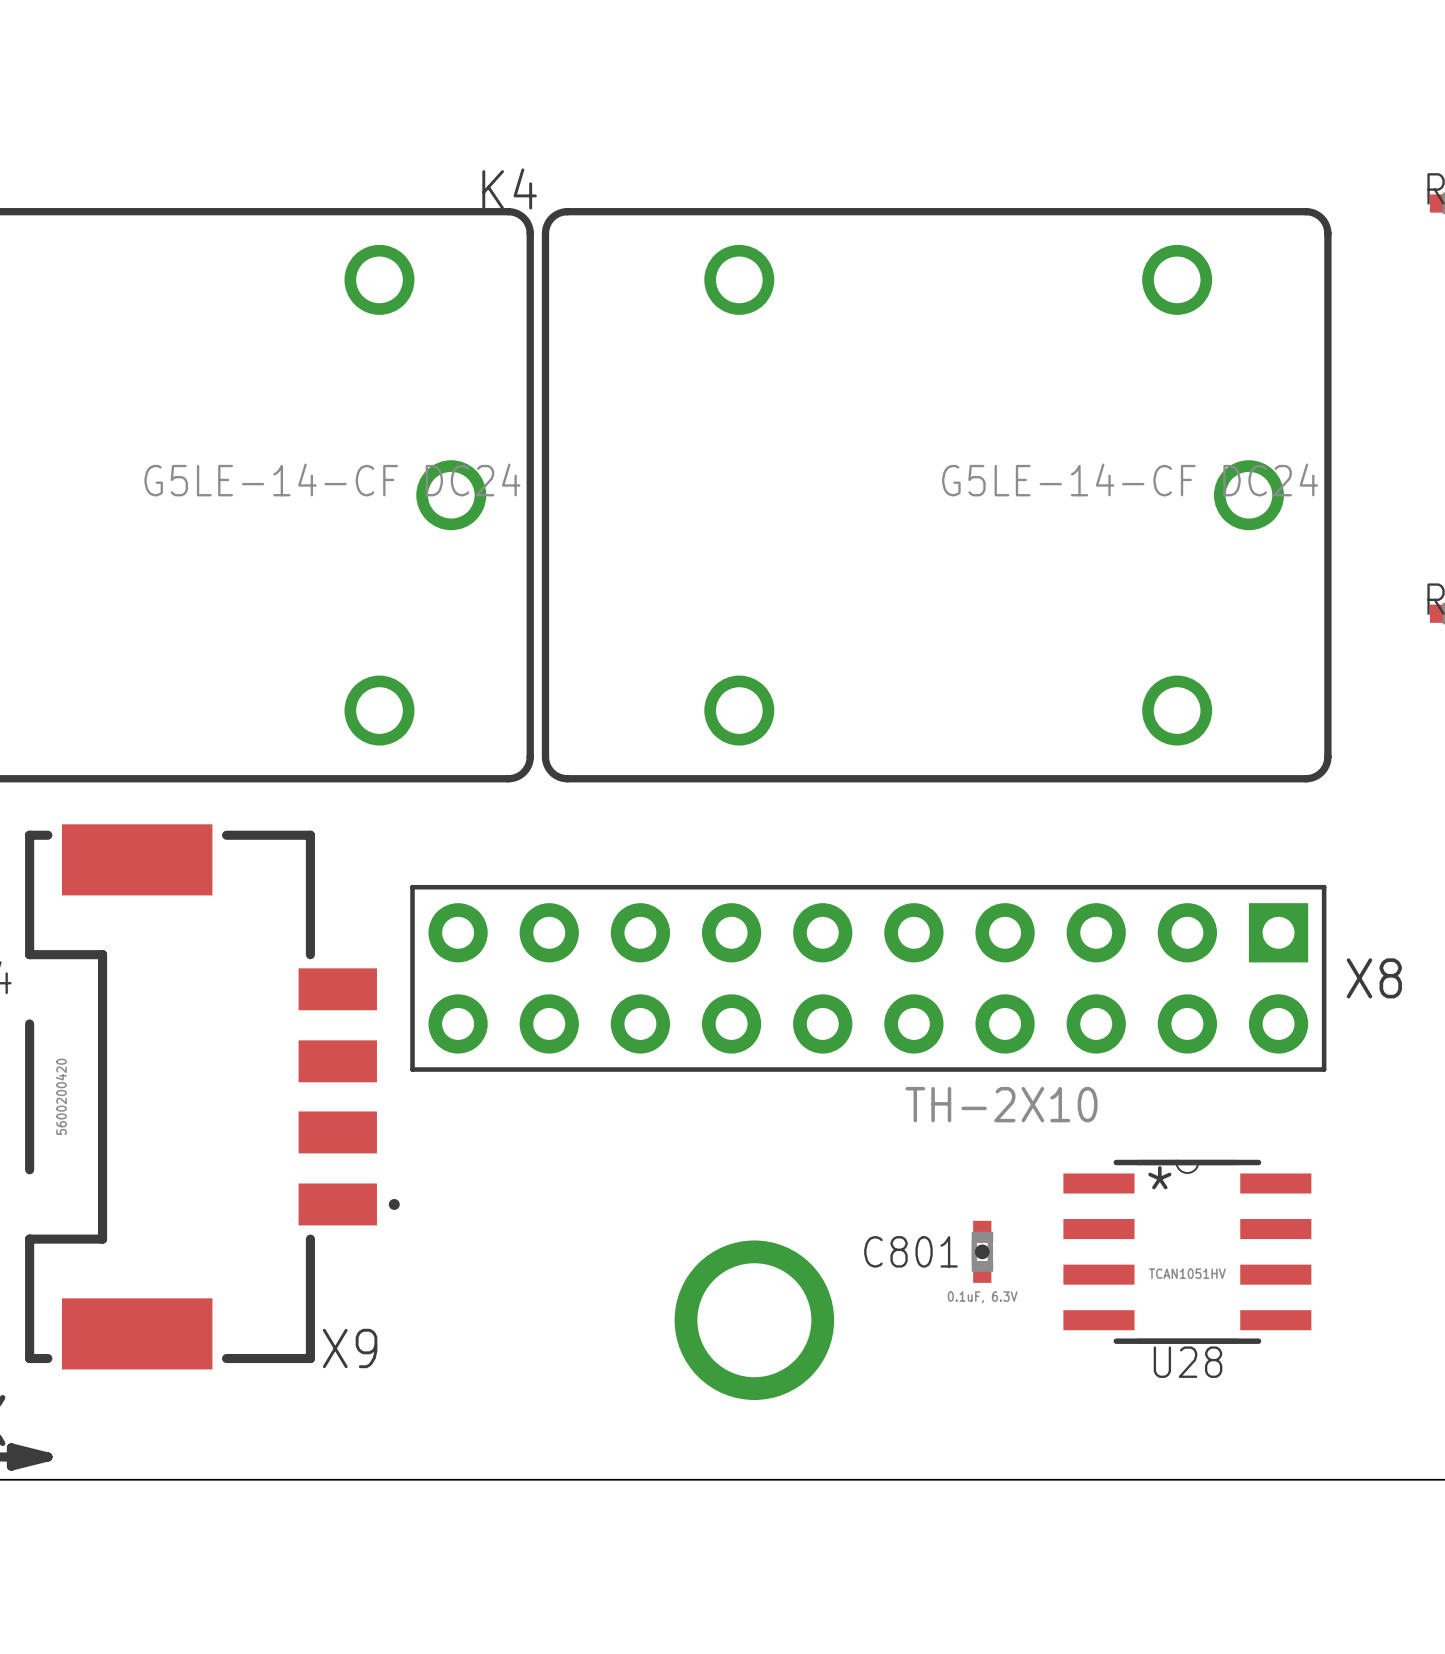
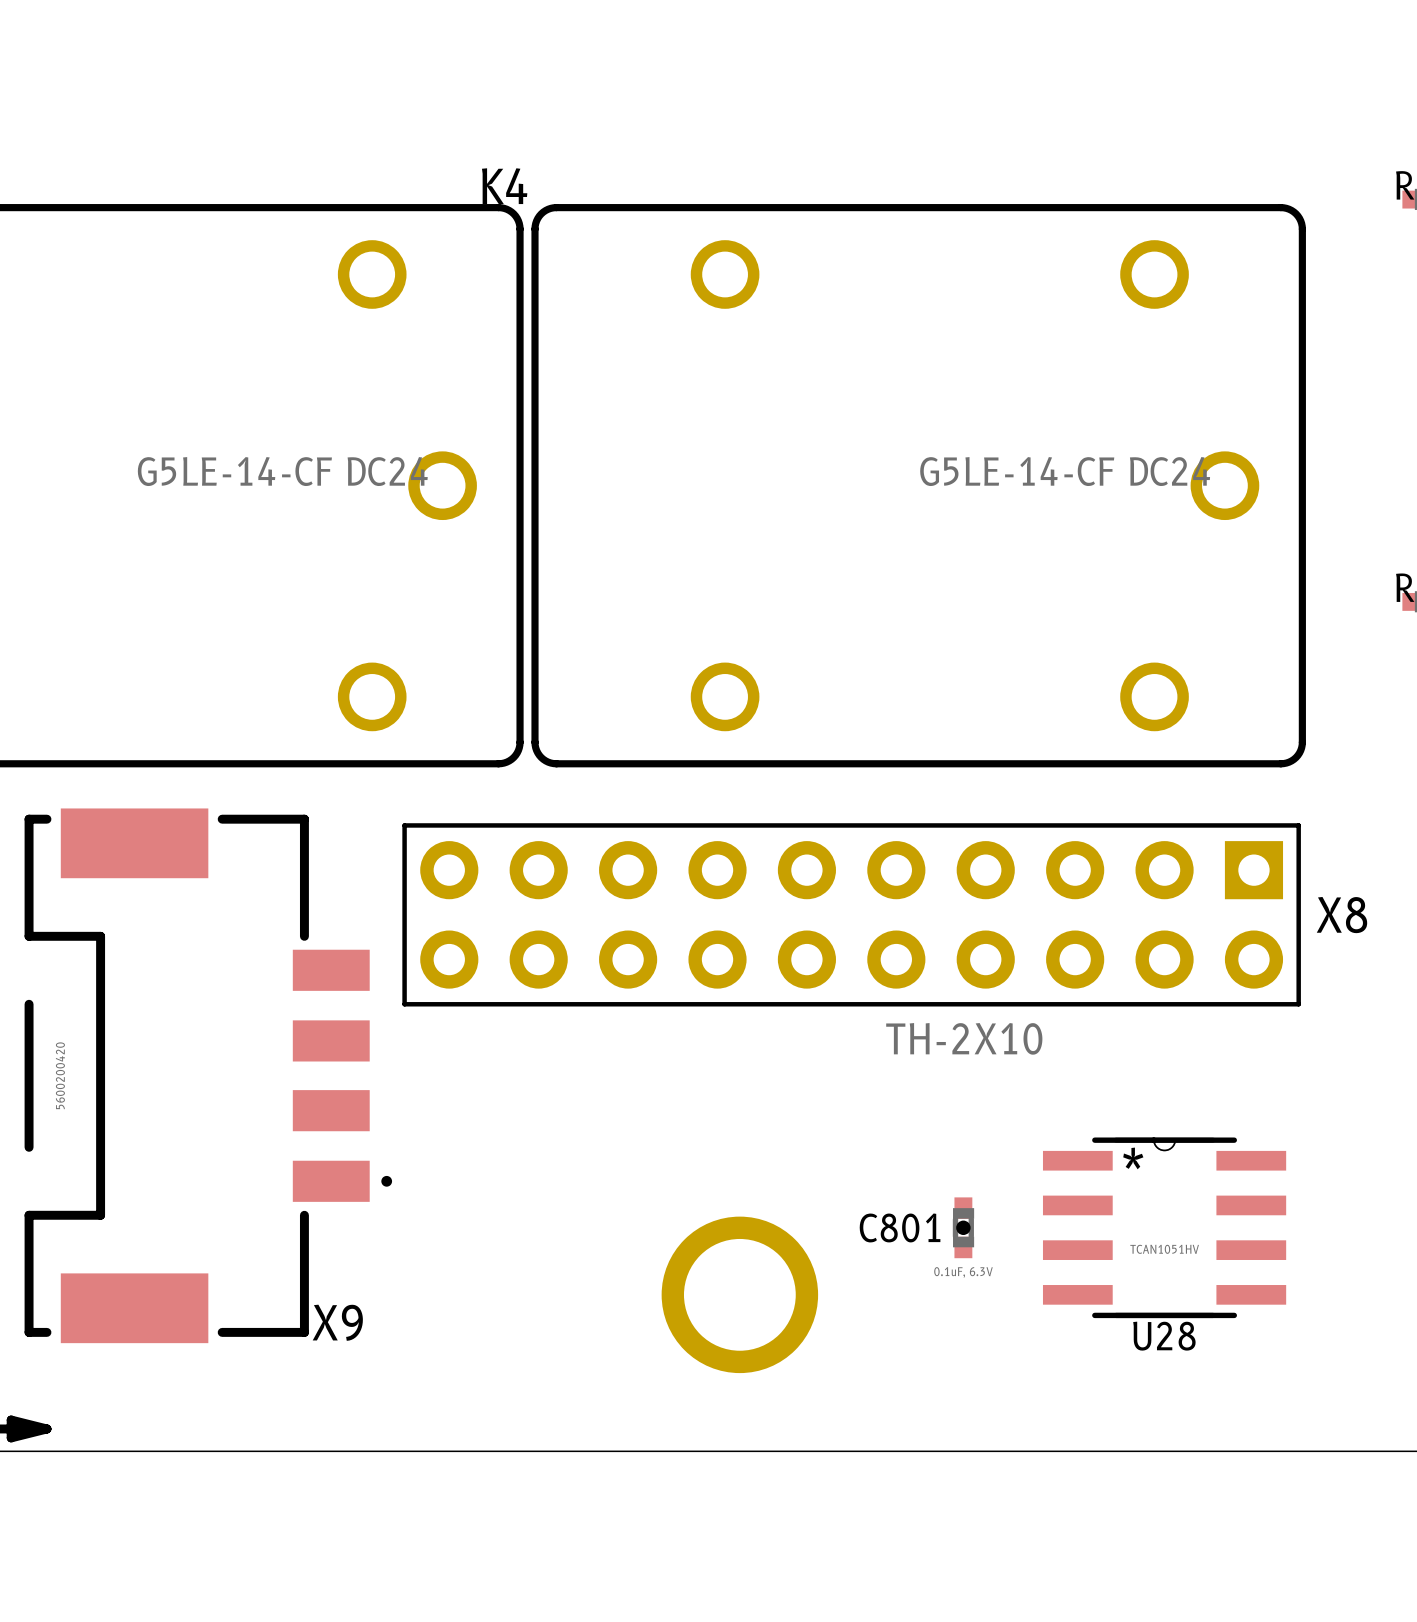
X8 position: (868, 978) -> (851, 914)

